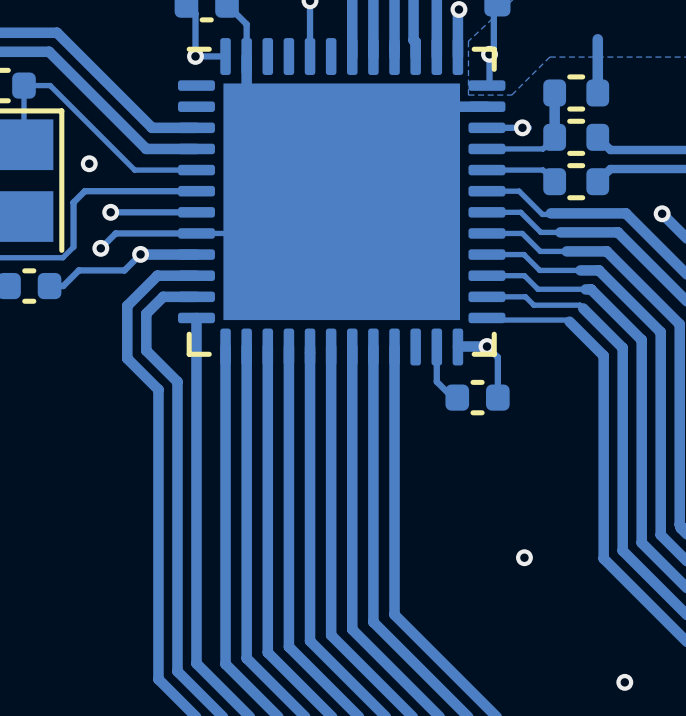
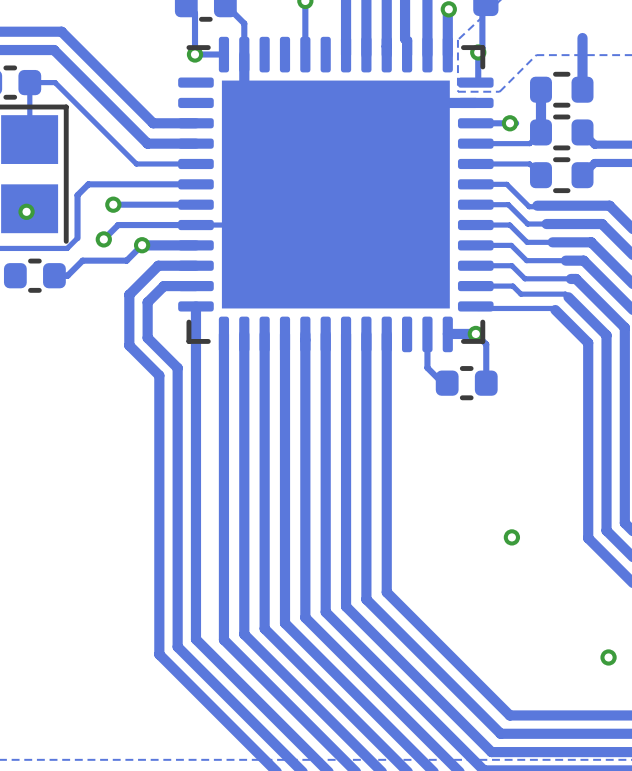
via position: (89, 163) -> (26, 211)

